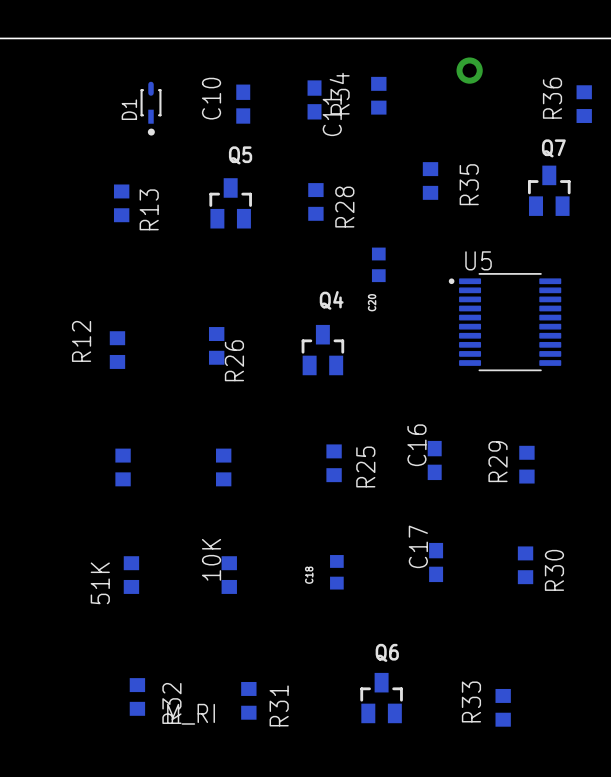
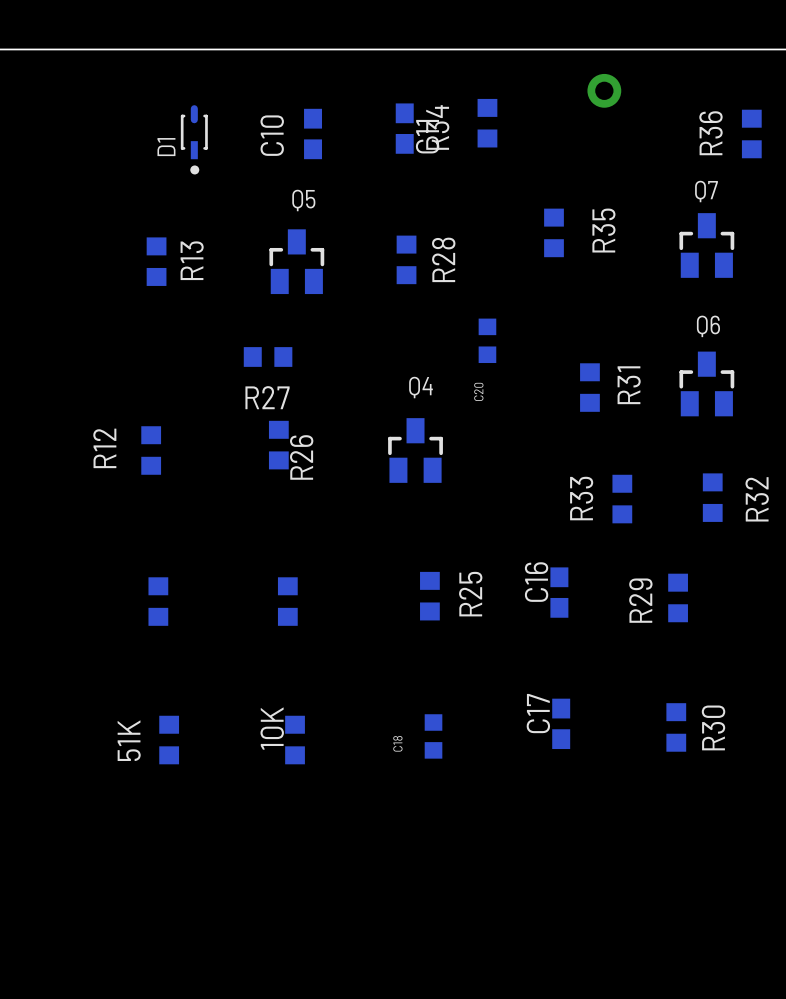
R27: none -> (268, 356)
U5: (505, 322) -> none
R32 position: (137, 696) -> (712, 497)
Q6 position: (381, 698) -> (706, 383)
R31 position: (248, 700) -> (589, 387)
R33 position: (503, 707) -> (622, 499)
M_RI: (191, 714) -> none

